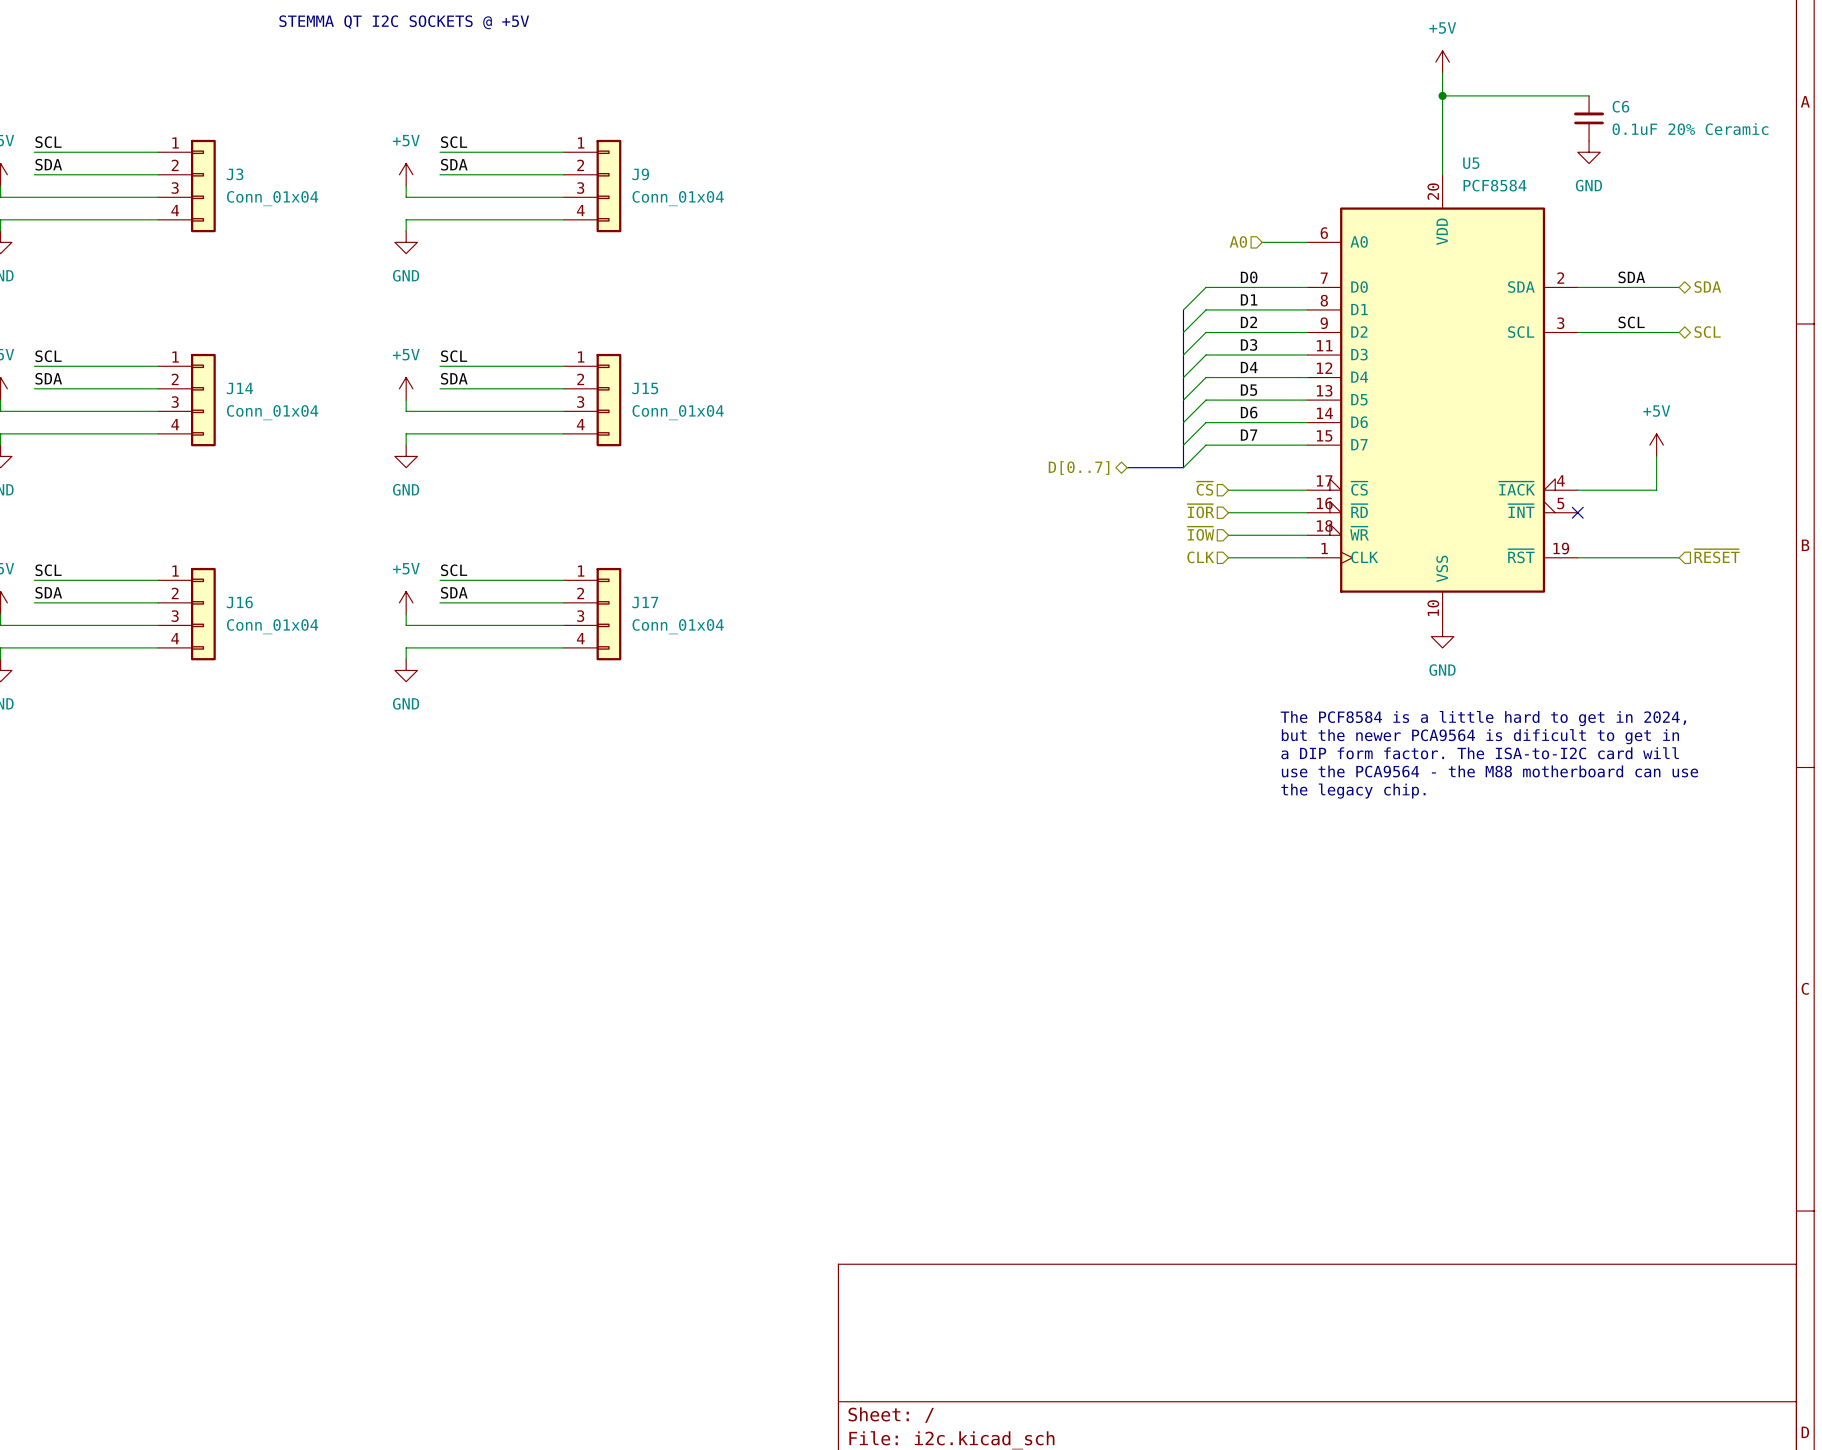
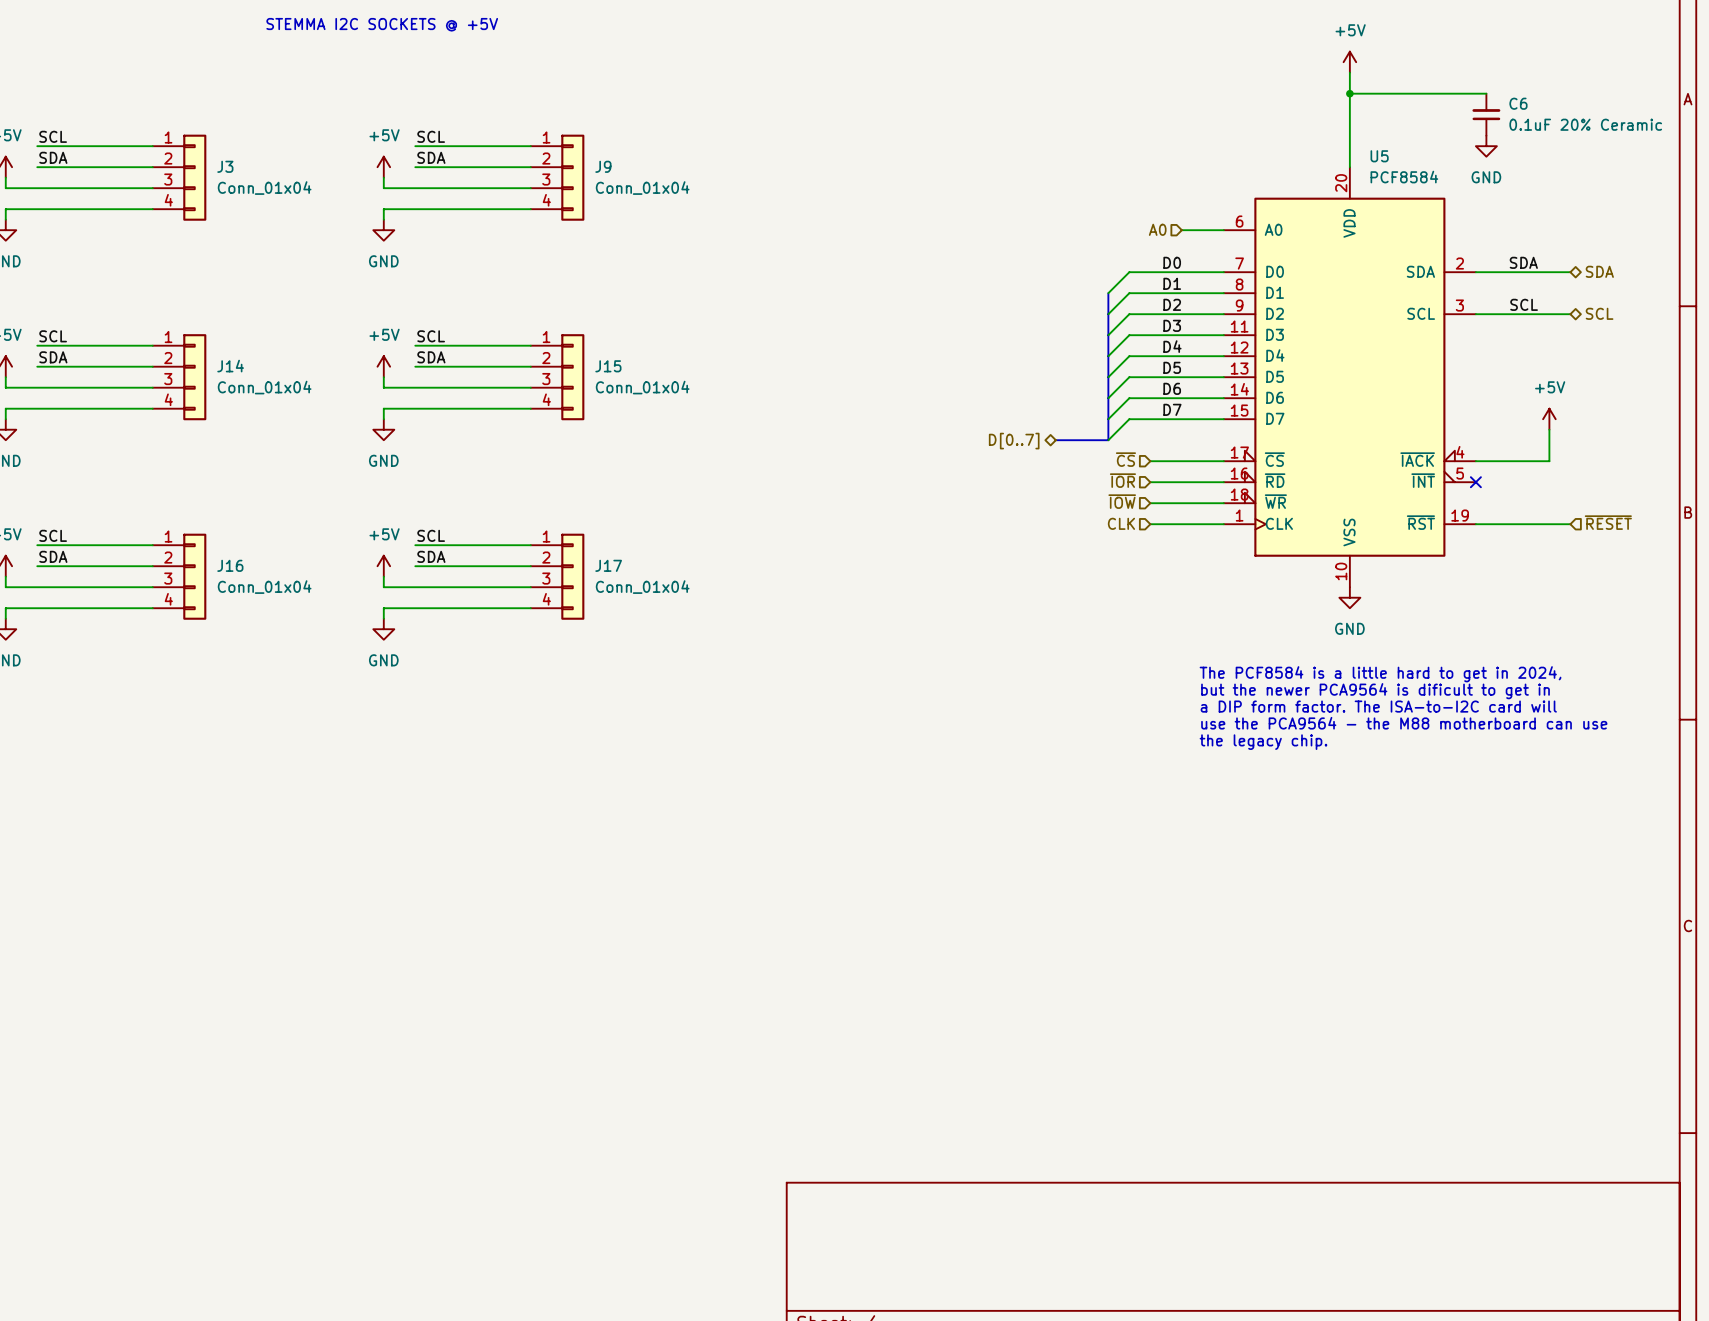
text: STEMMA QT I2C SOCKETS @ +5V (404, 22) -> STEMMA I2C SOCKETS @ +5V (382, 24)

